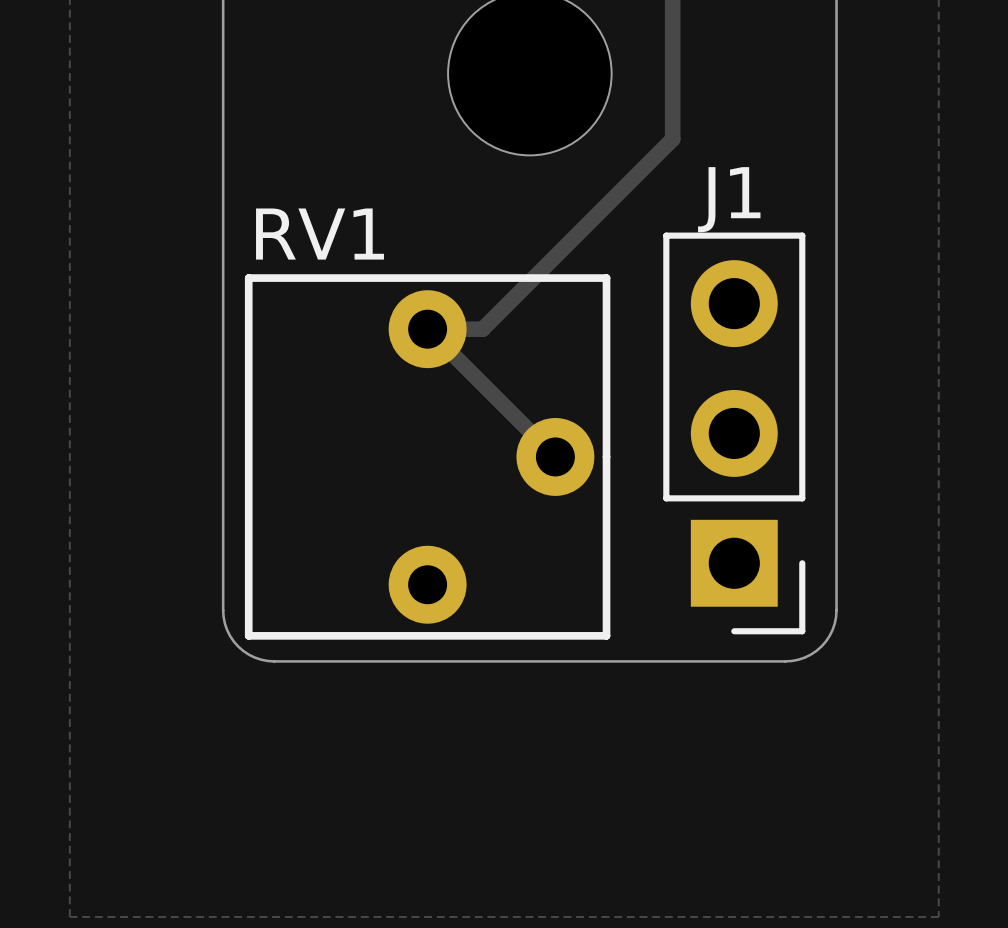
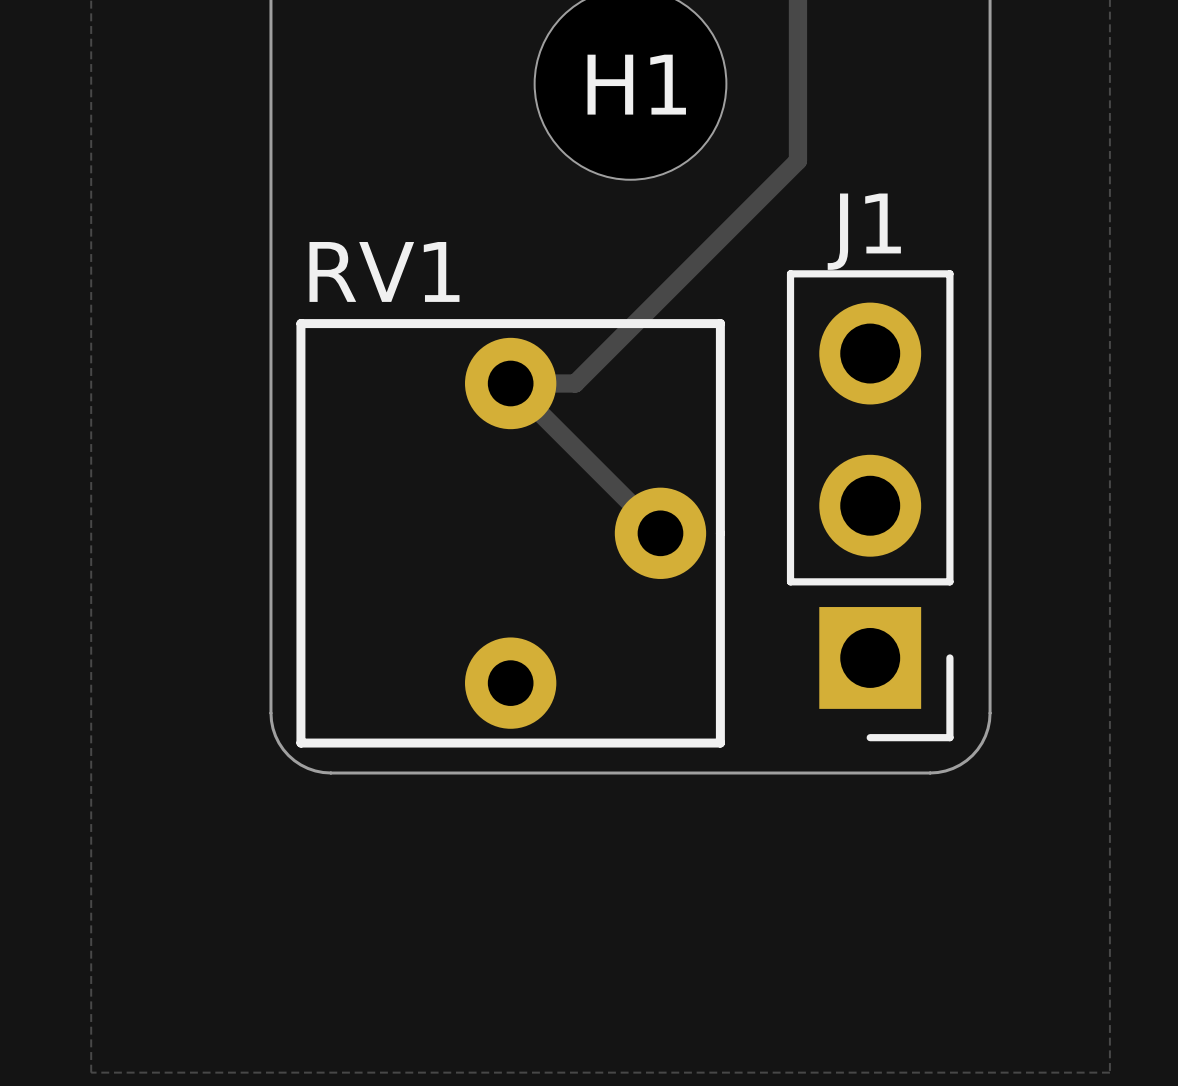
H1 name: none -> H1 (636, 84)

